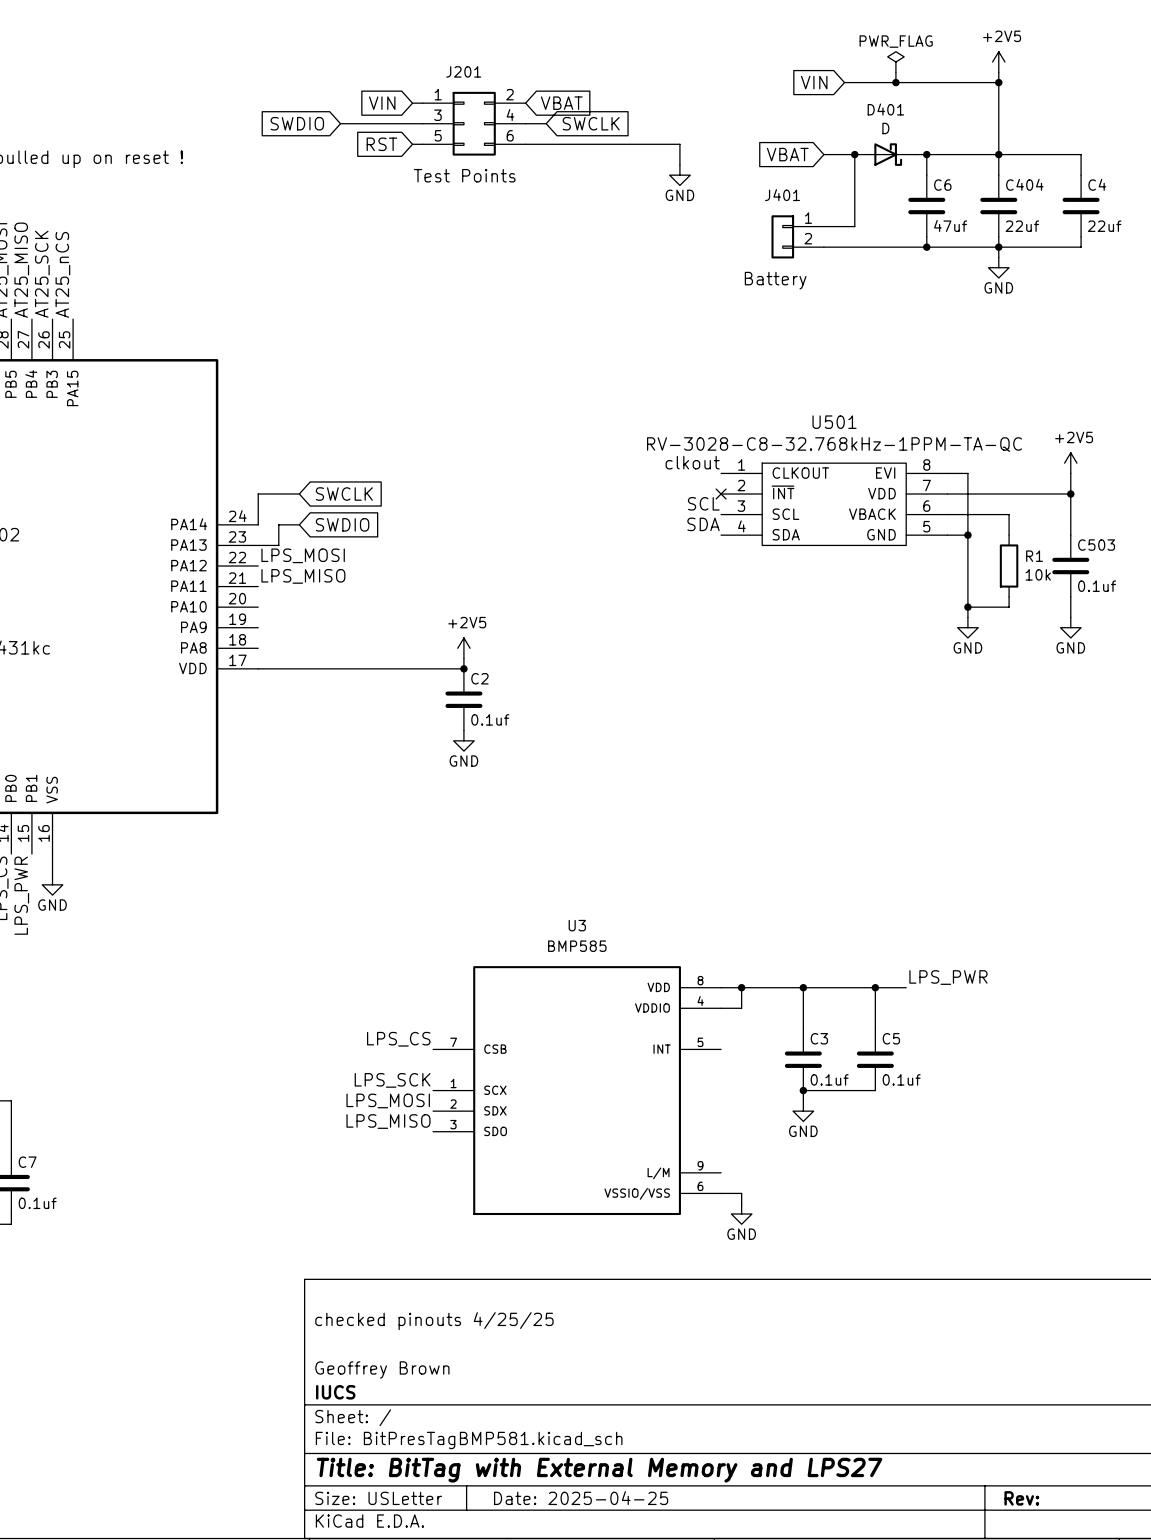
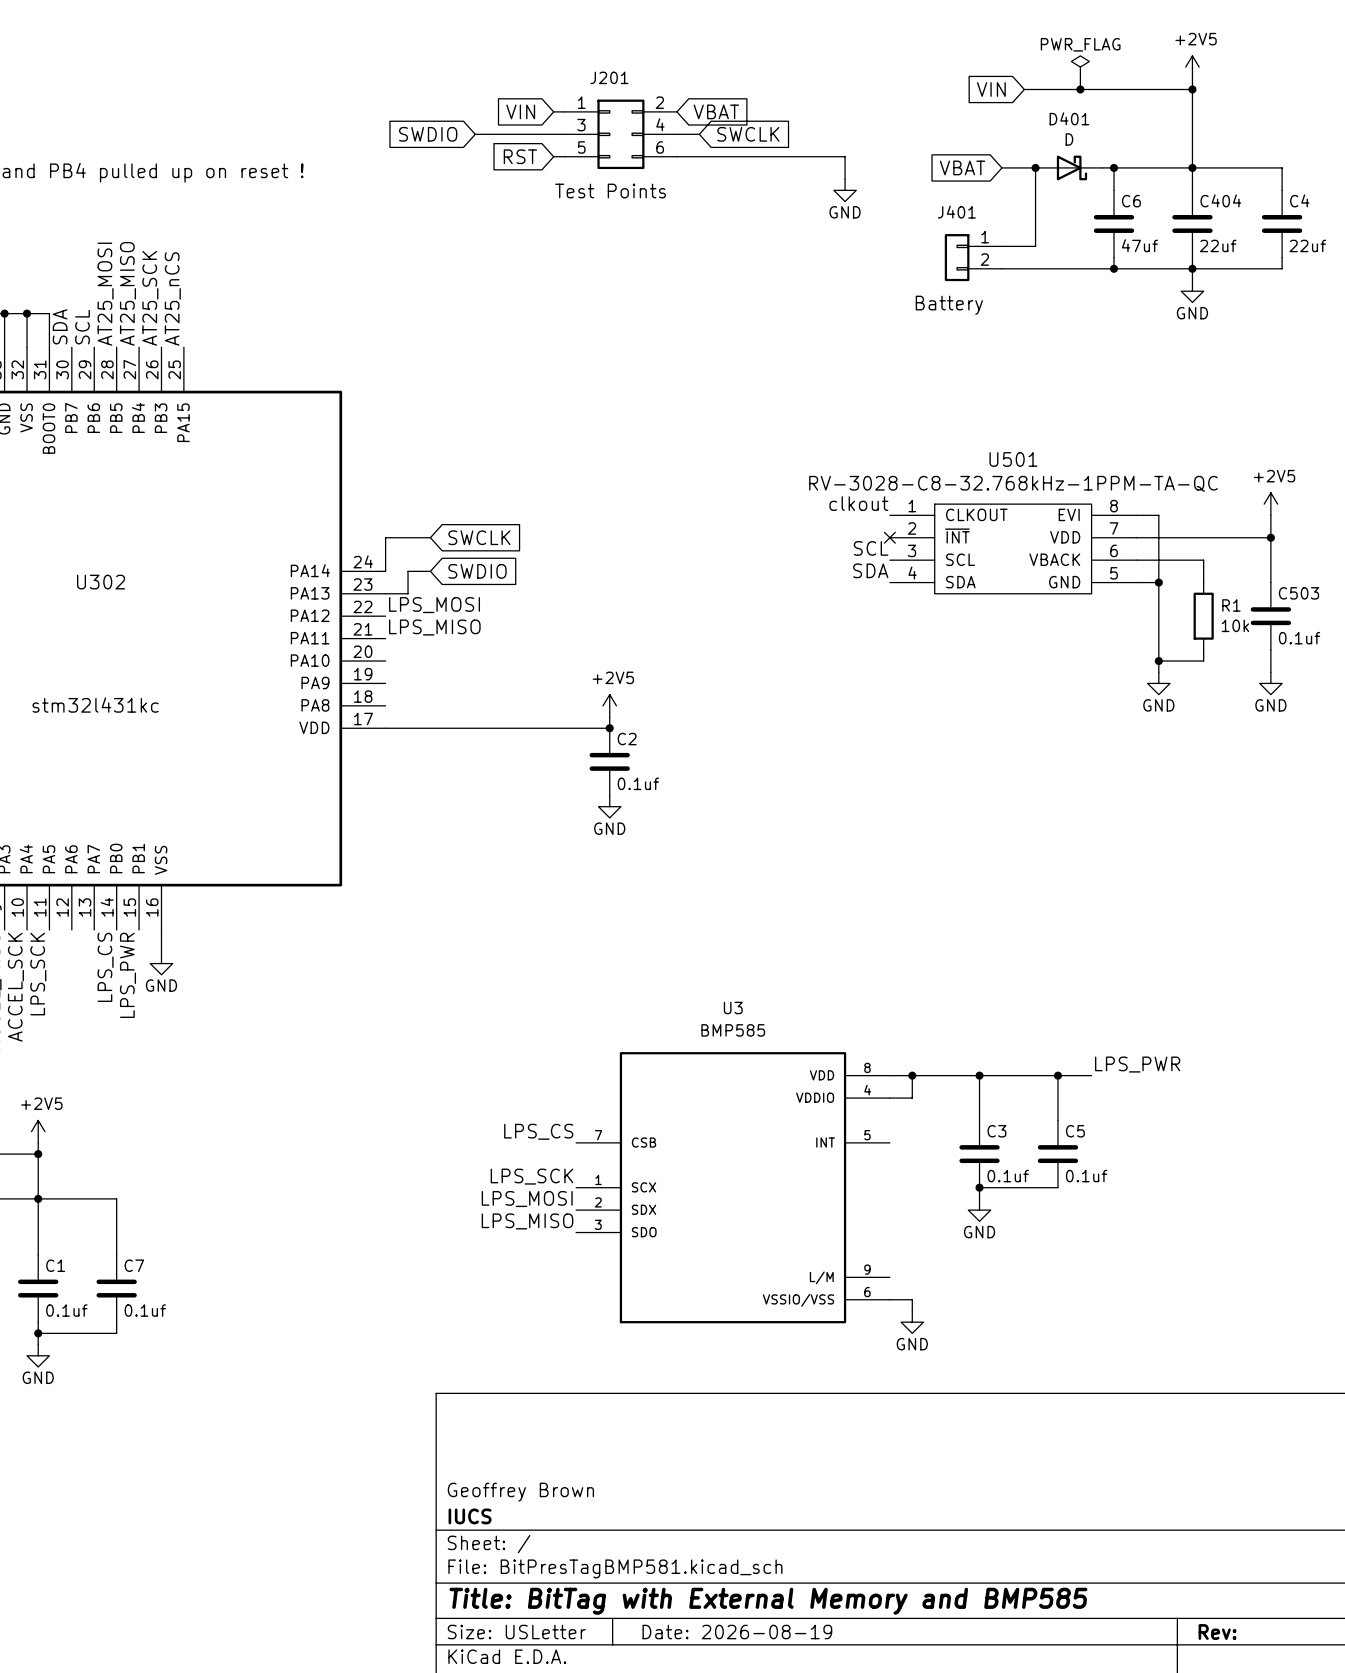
title block: checked pinouts 4/25/25 (434, 1321) -> none
title block: Title: BitTag with External Memory and LPS27 (599, 1470) -> Title: BitTag with External Memory and BMP585 (768, 1601)
title block: Date: 2025-04-25 (581, 1498) -> Date: 2026-08-19 (737, 1632)

